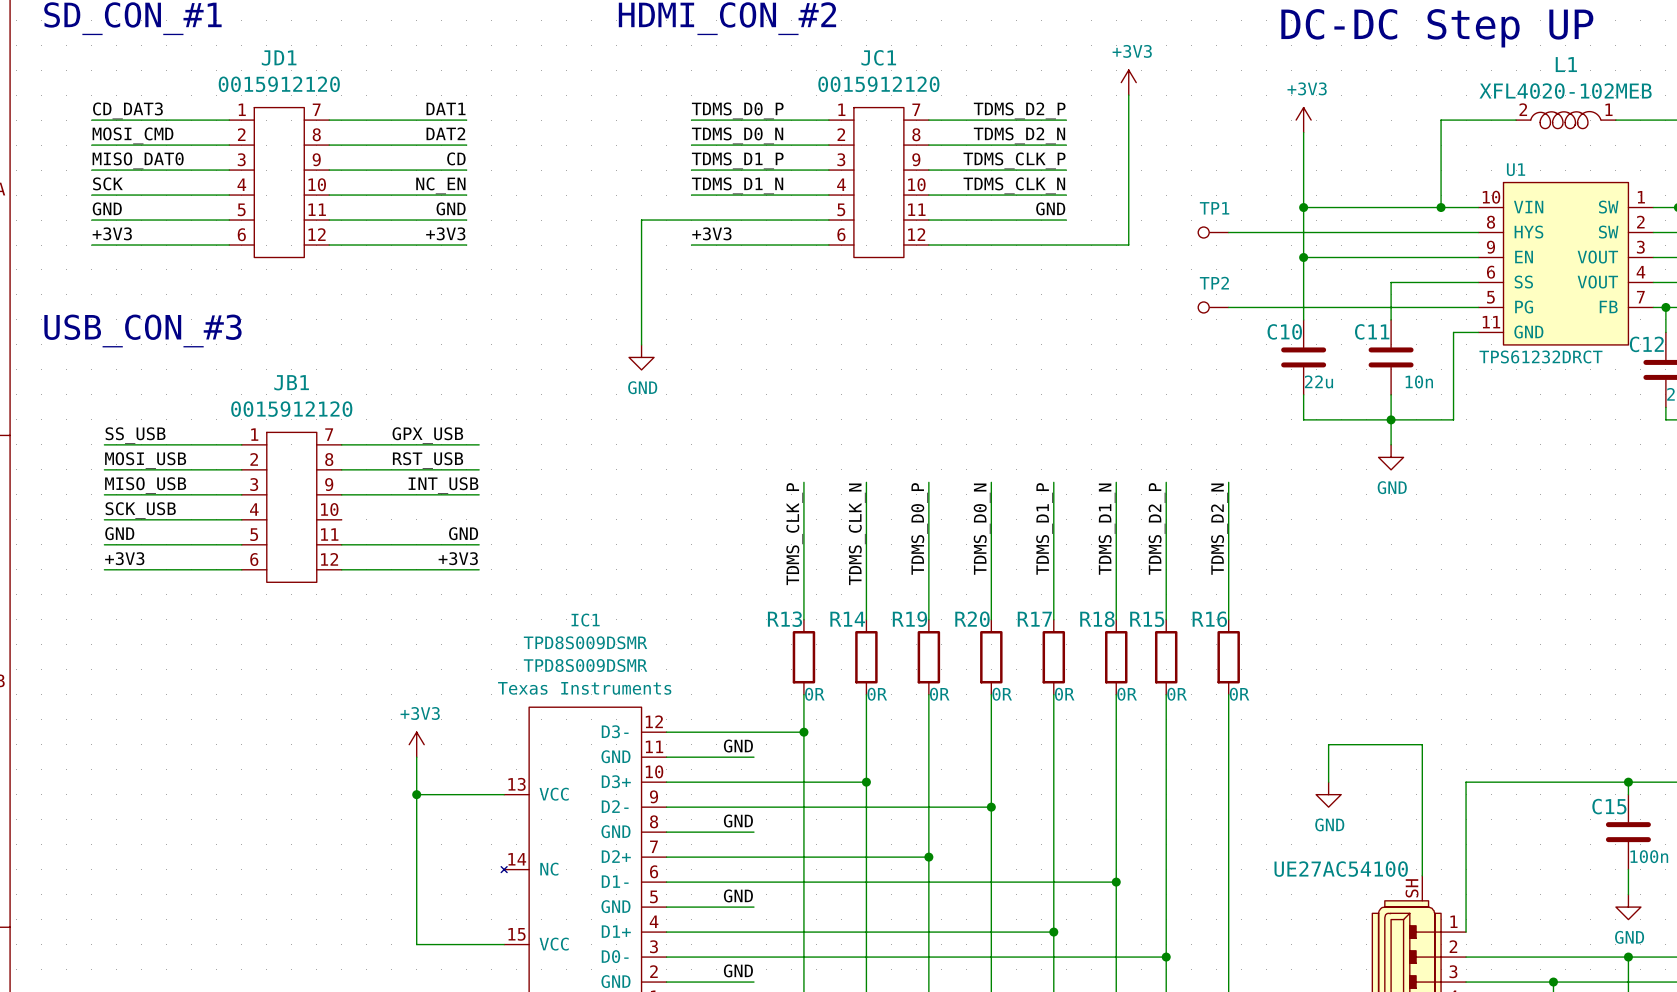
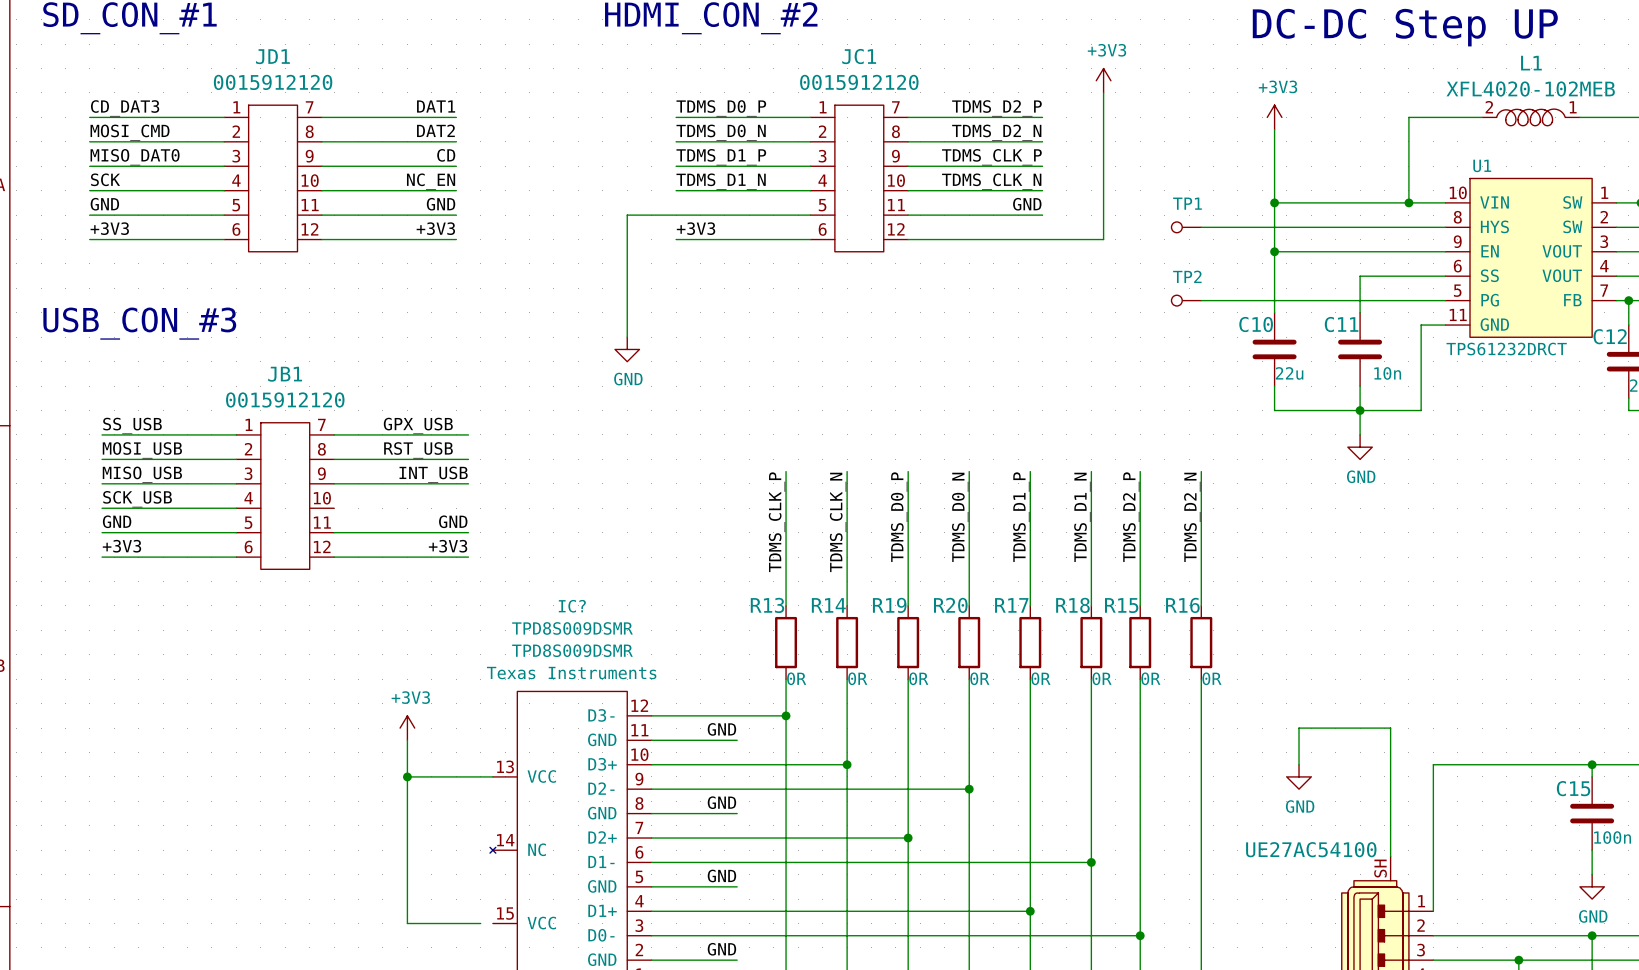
IC1 name: IC1 (585, 620) -> IC? (572, 606)
wire: (491, 944) (504, 944) -> none

